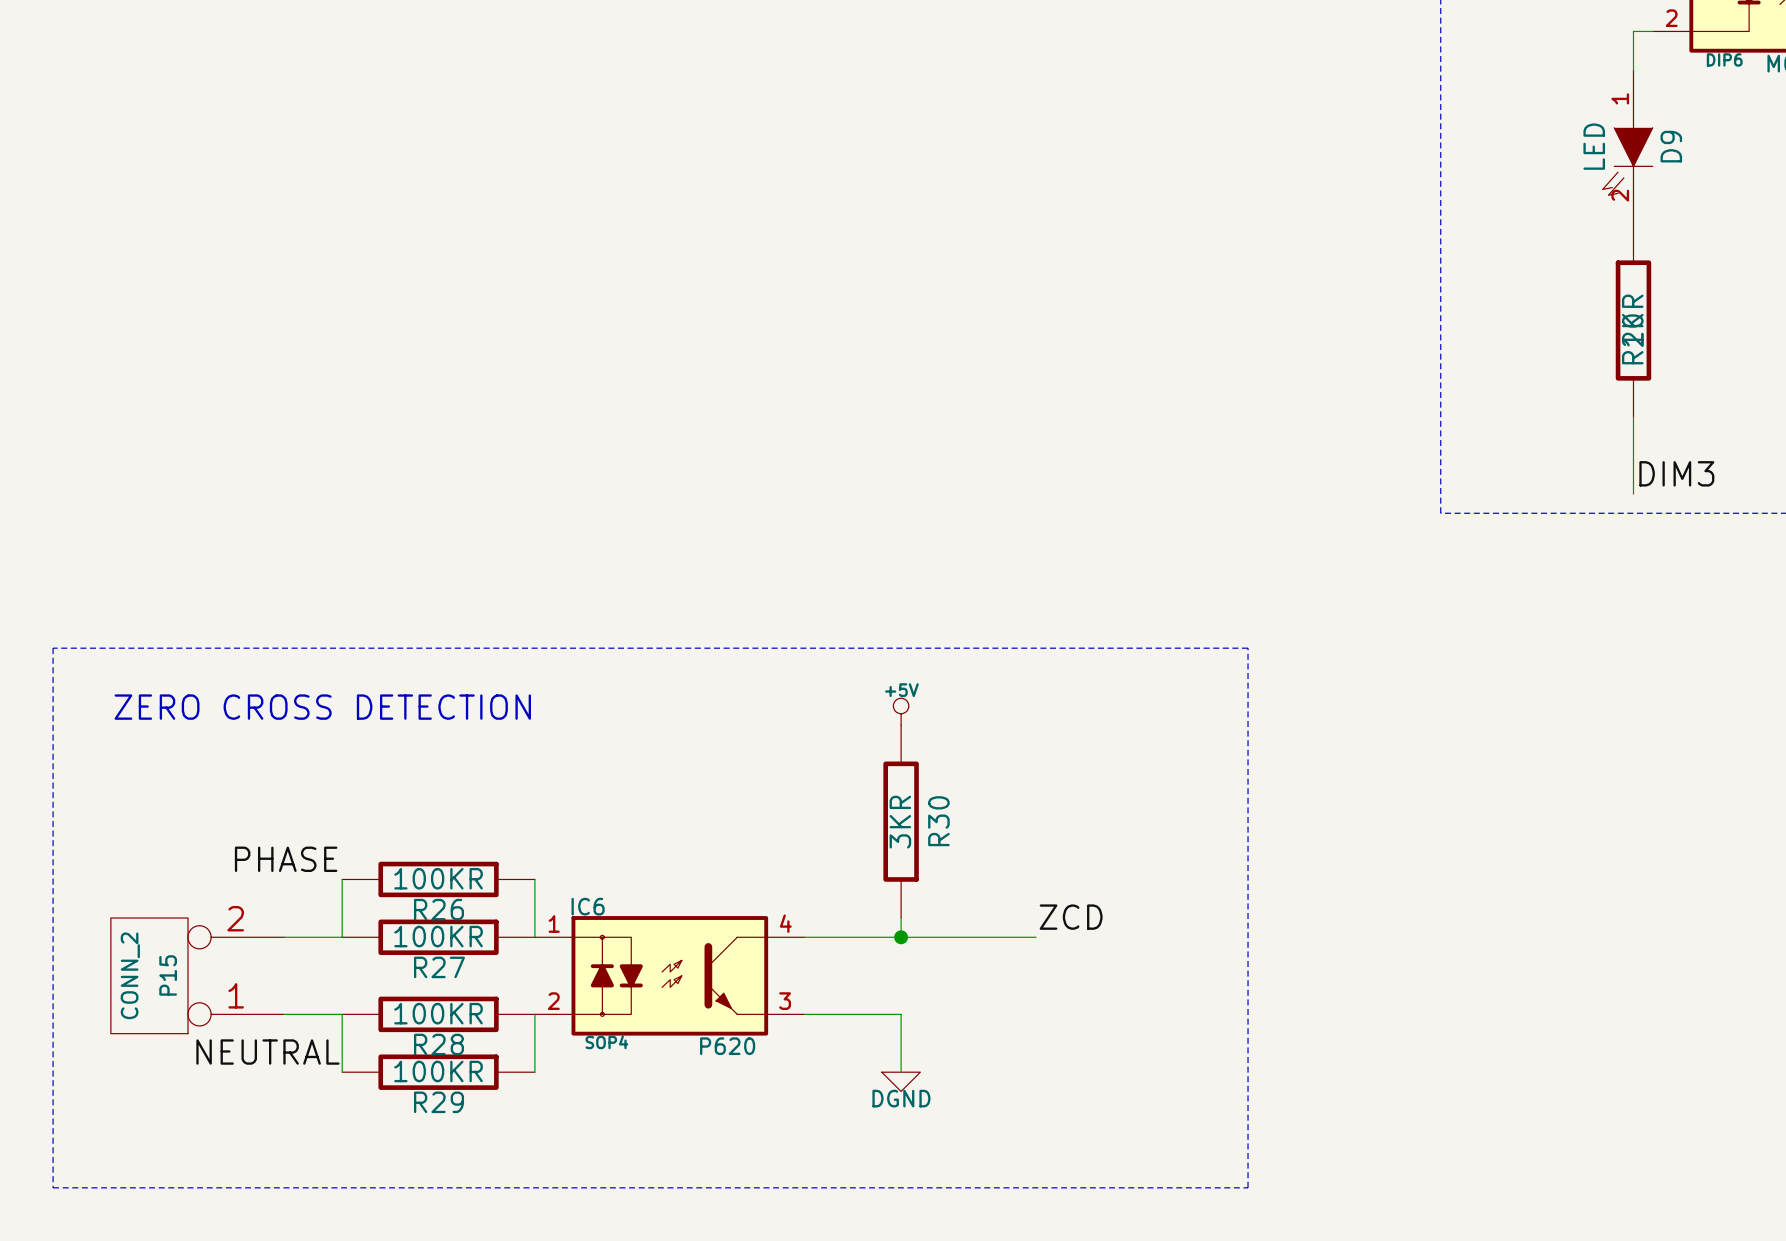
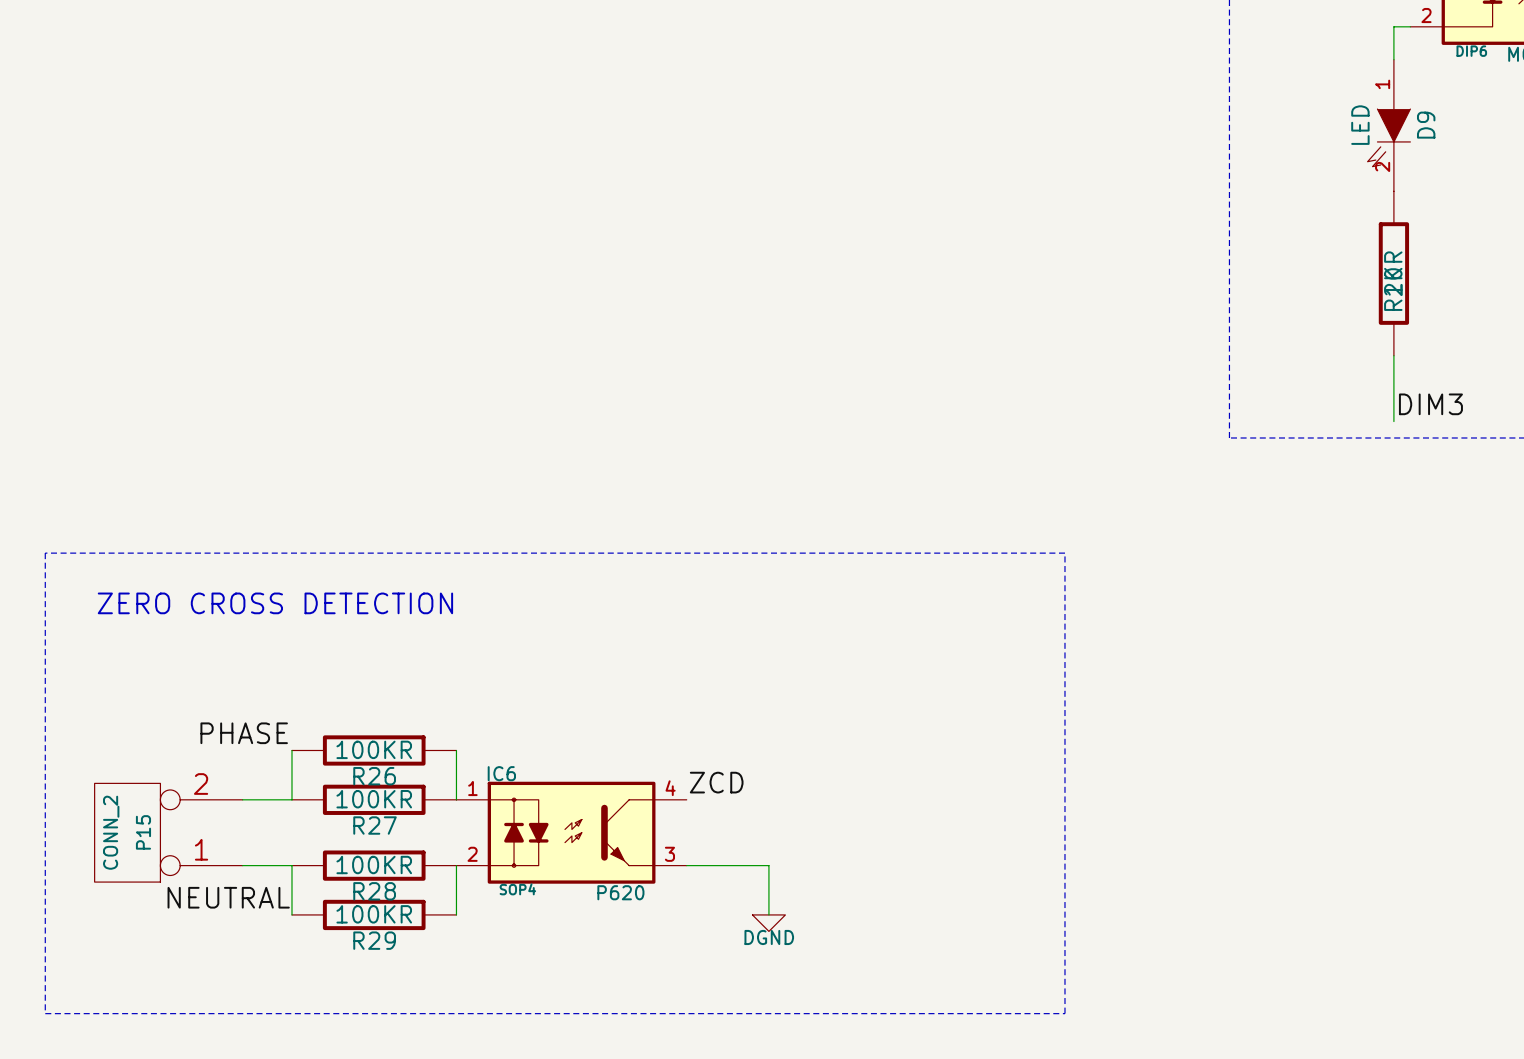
power symbol: +5V (901, 711) -> none
R30: 3KR (901, 821) -> none
label position: ZCD (1071, 917) -> ZCD (716, 782)
wire: (901, 918) (901, 937) -> none
wire: (804, 937) (1036, 937) -> none
junction: (901, 937) -> none

